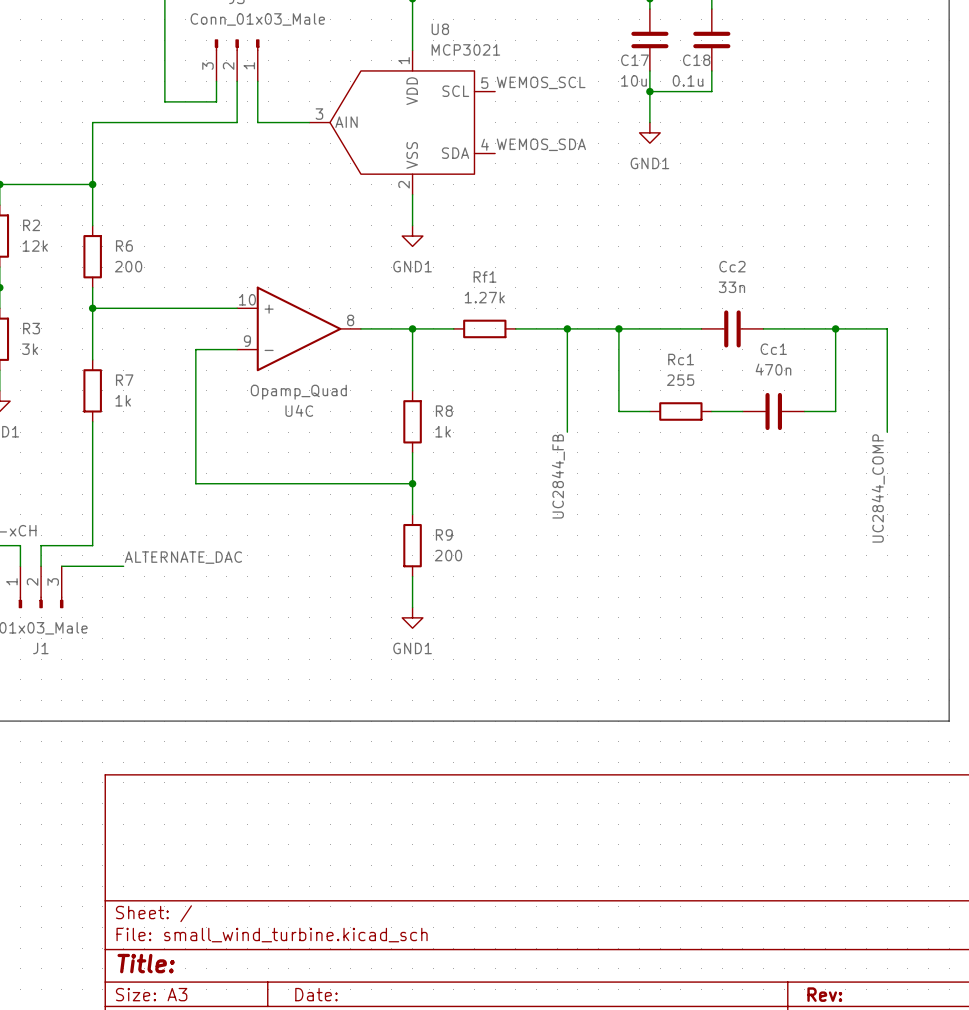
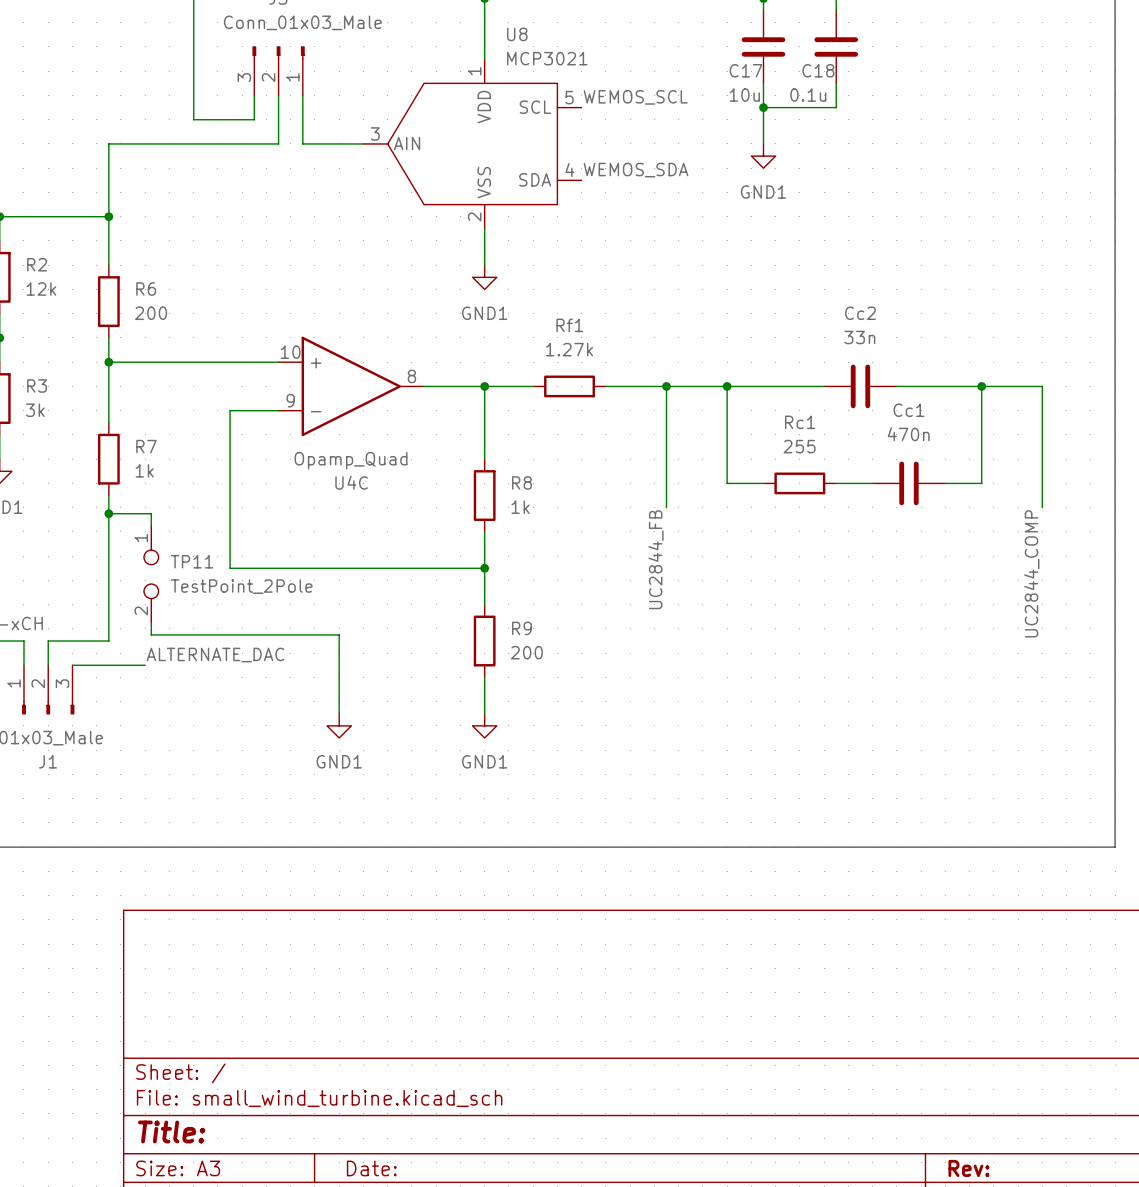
wire: none -> (108, 513) (151, 513) (151, 525)
junction: none -> (108, 513)
TP11: none -> TestPoint_2Pole (151, 574)
wire: none -> (151, 622) (151, 634) (339, 634) (339, 713)
power symbol: none -> GND1 (339, 725)

